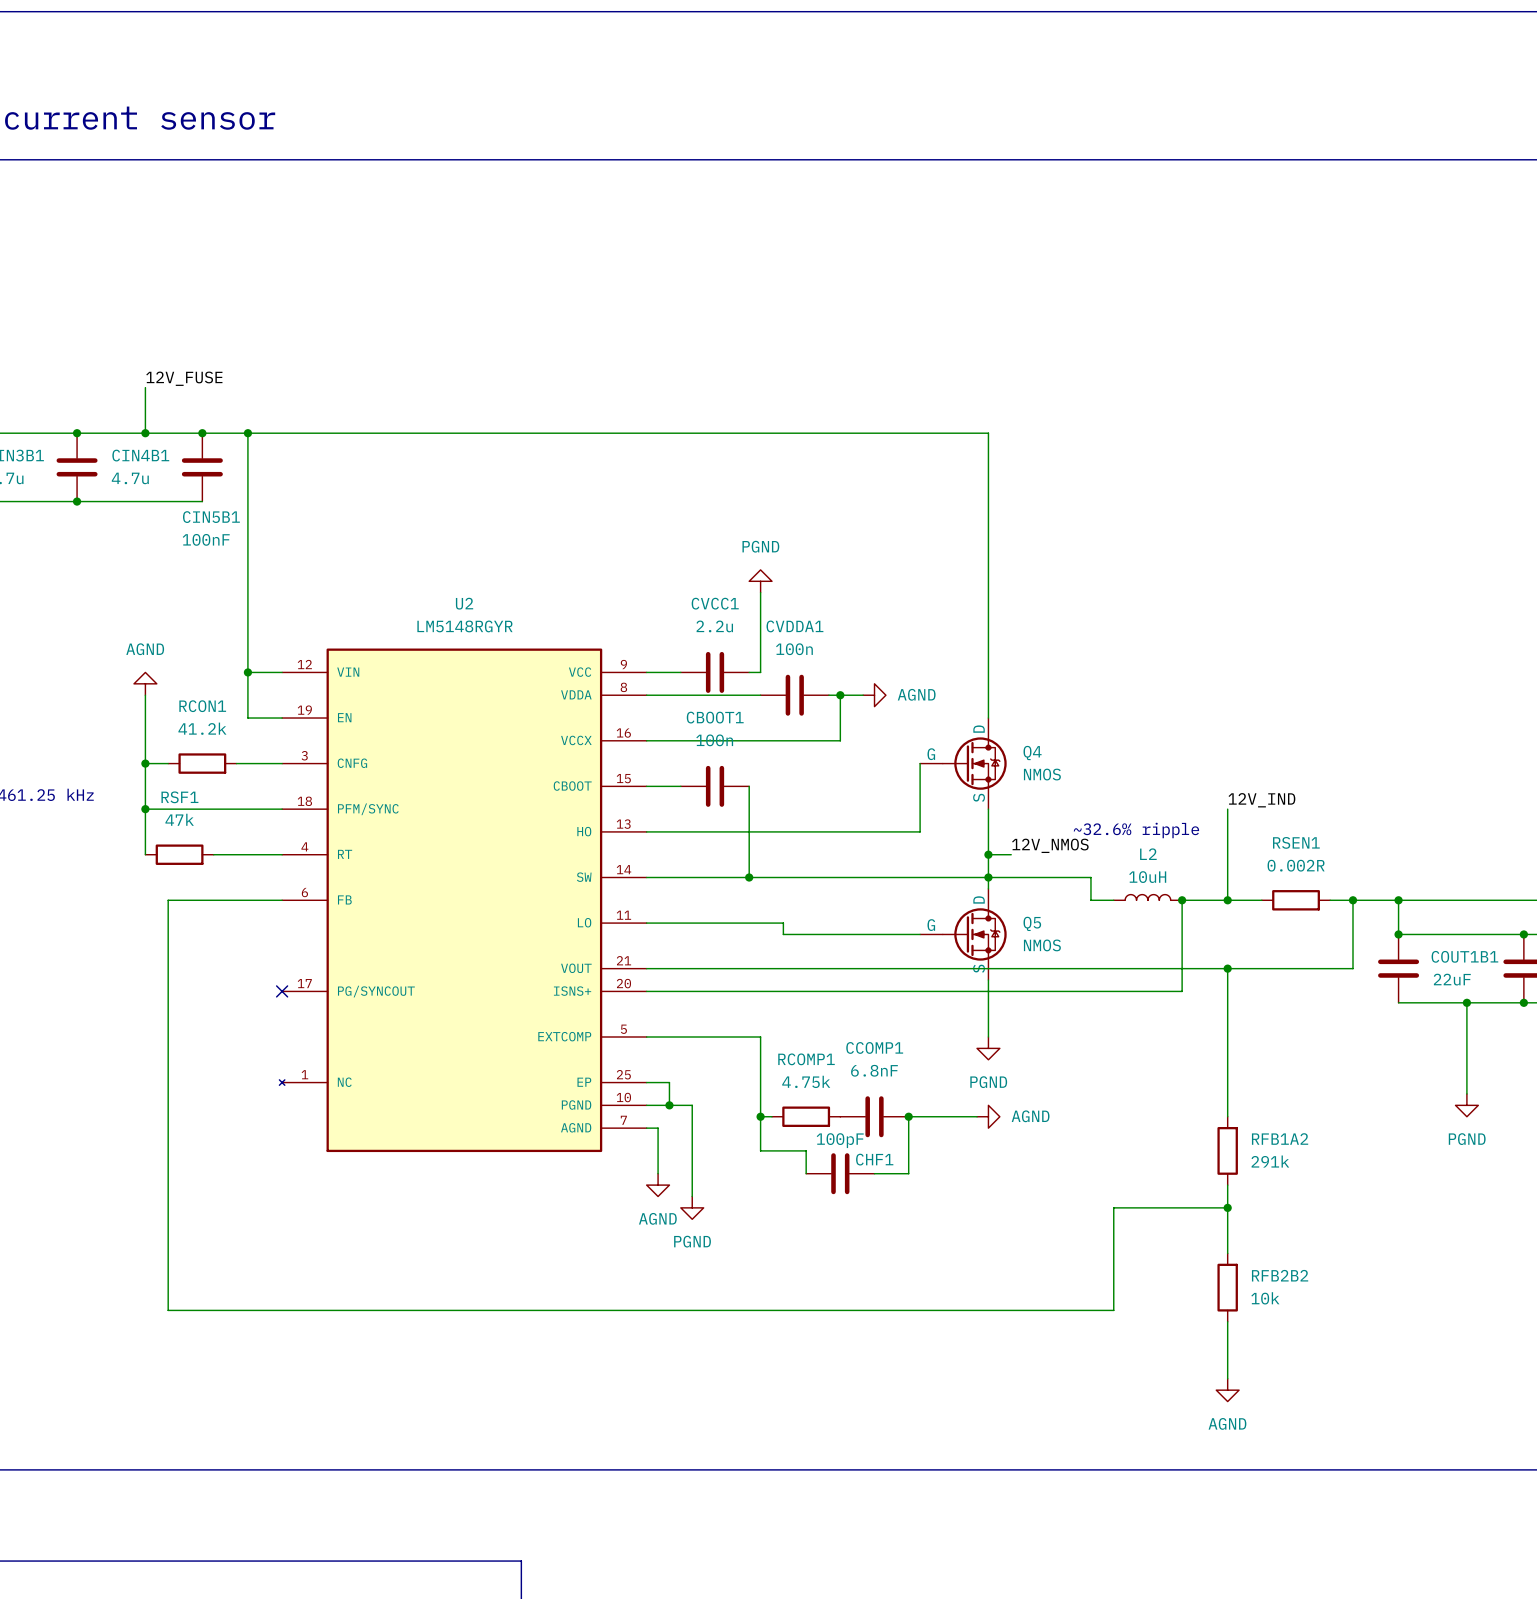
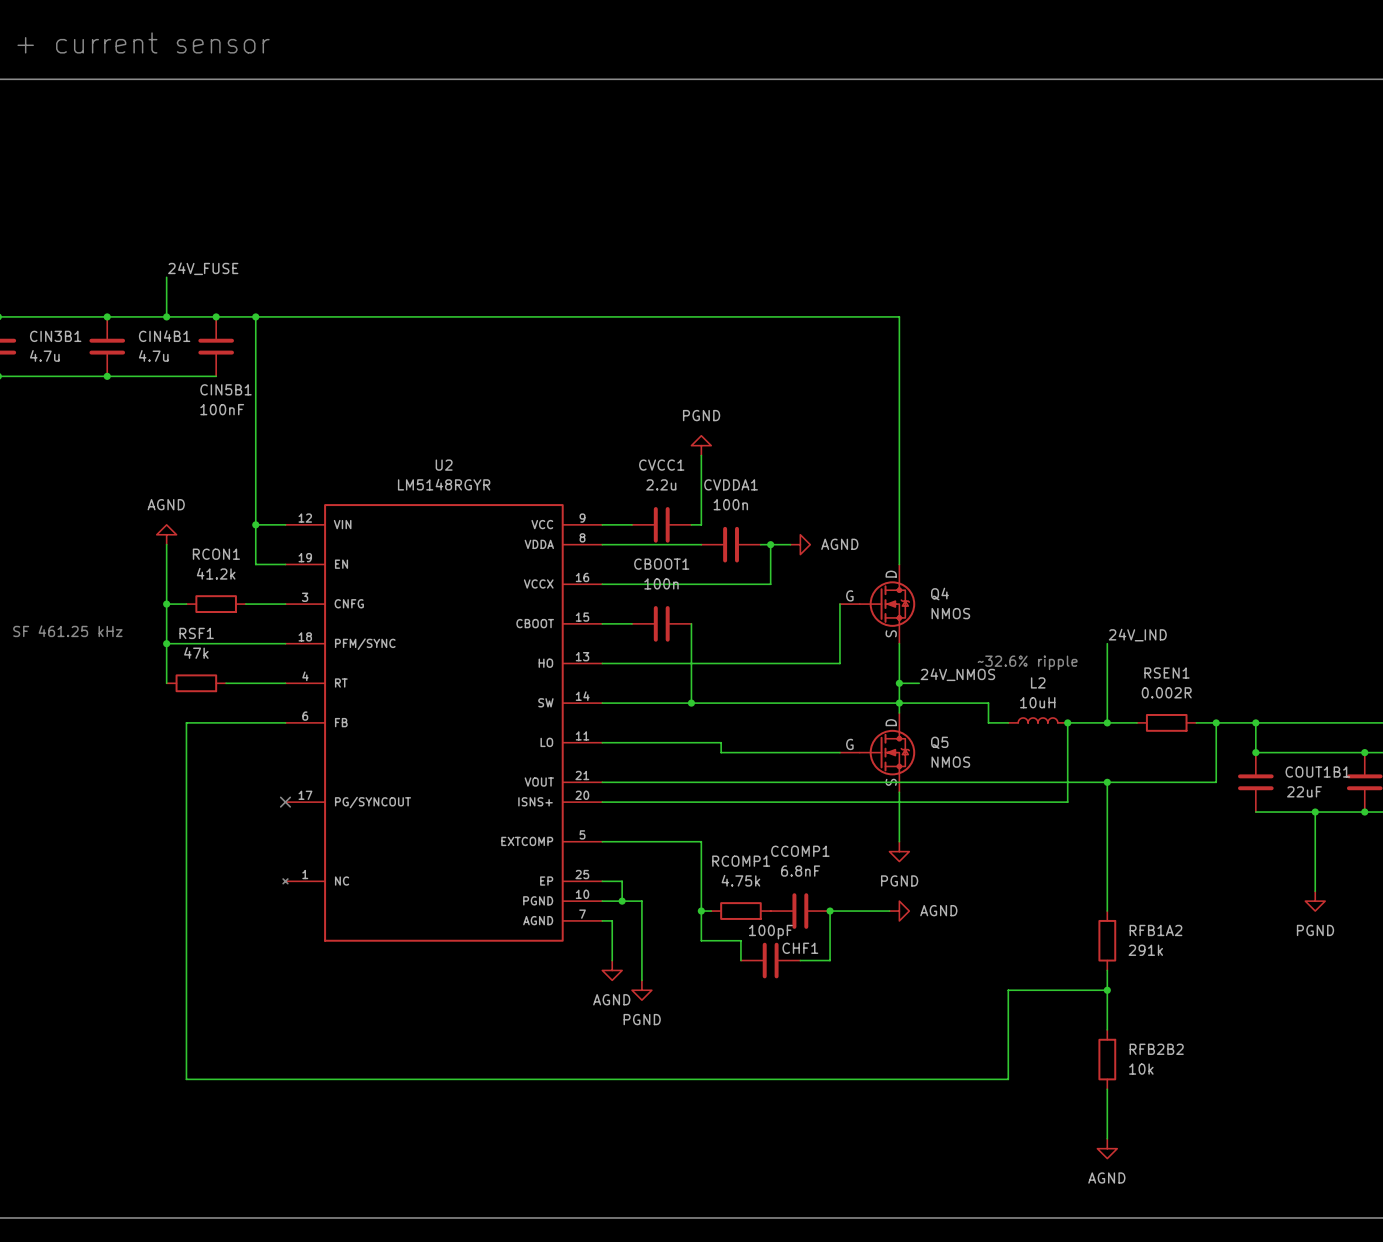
label: 12V_FUSE (184, 378) -> 24V_FUSE (203, 268)
label: 12V_IND (1261, 800) -> 24V_IND (1137, 635)
label: 12V_NMOS (1050, 845) -> 24V_NMOS (957, 674)

